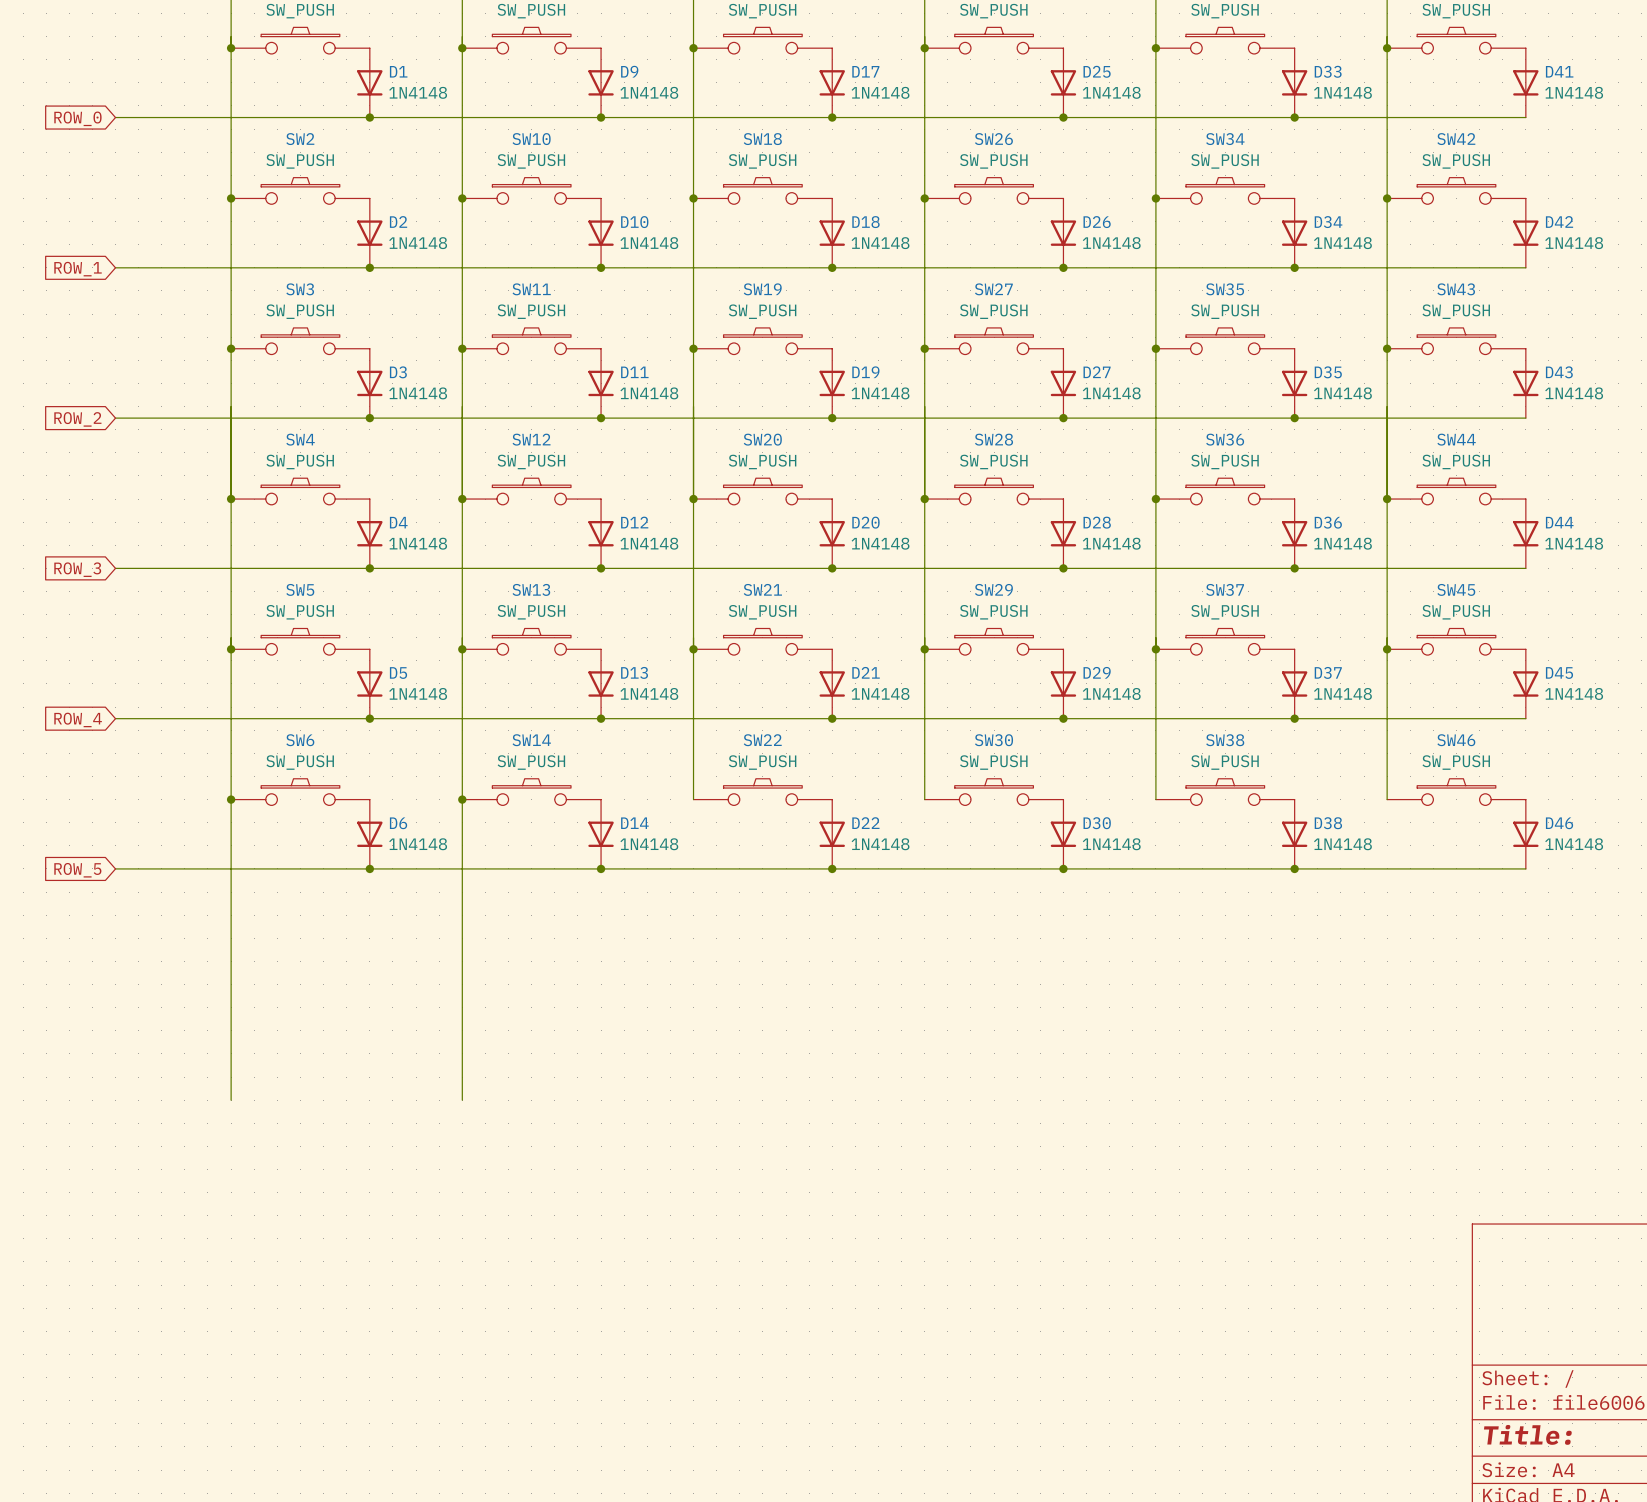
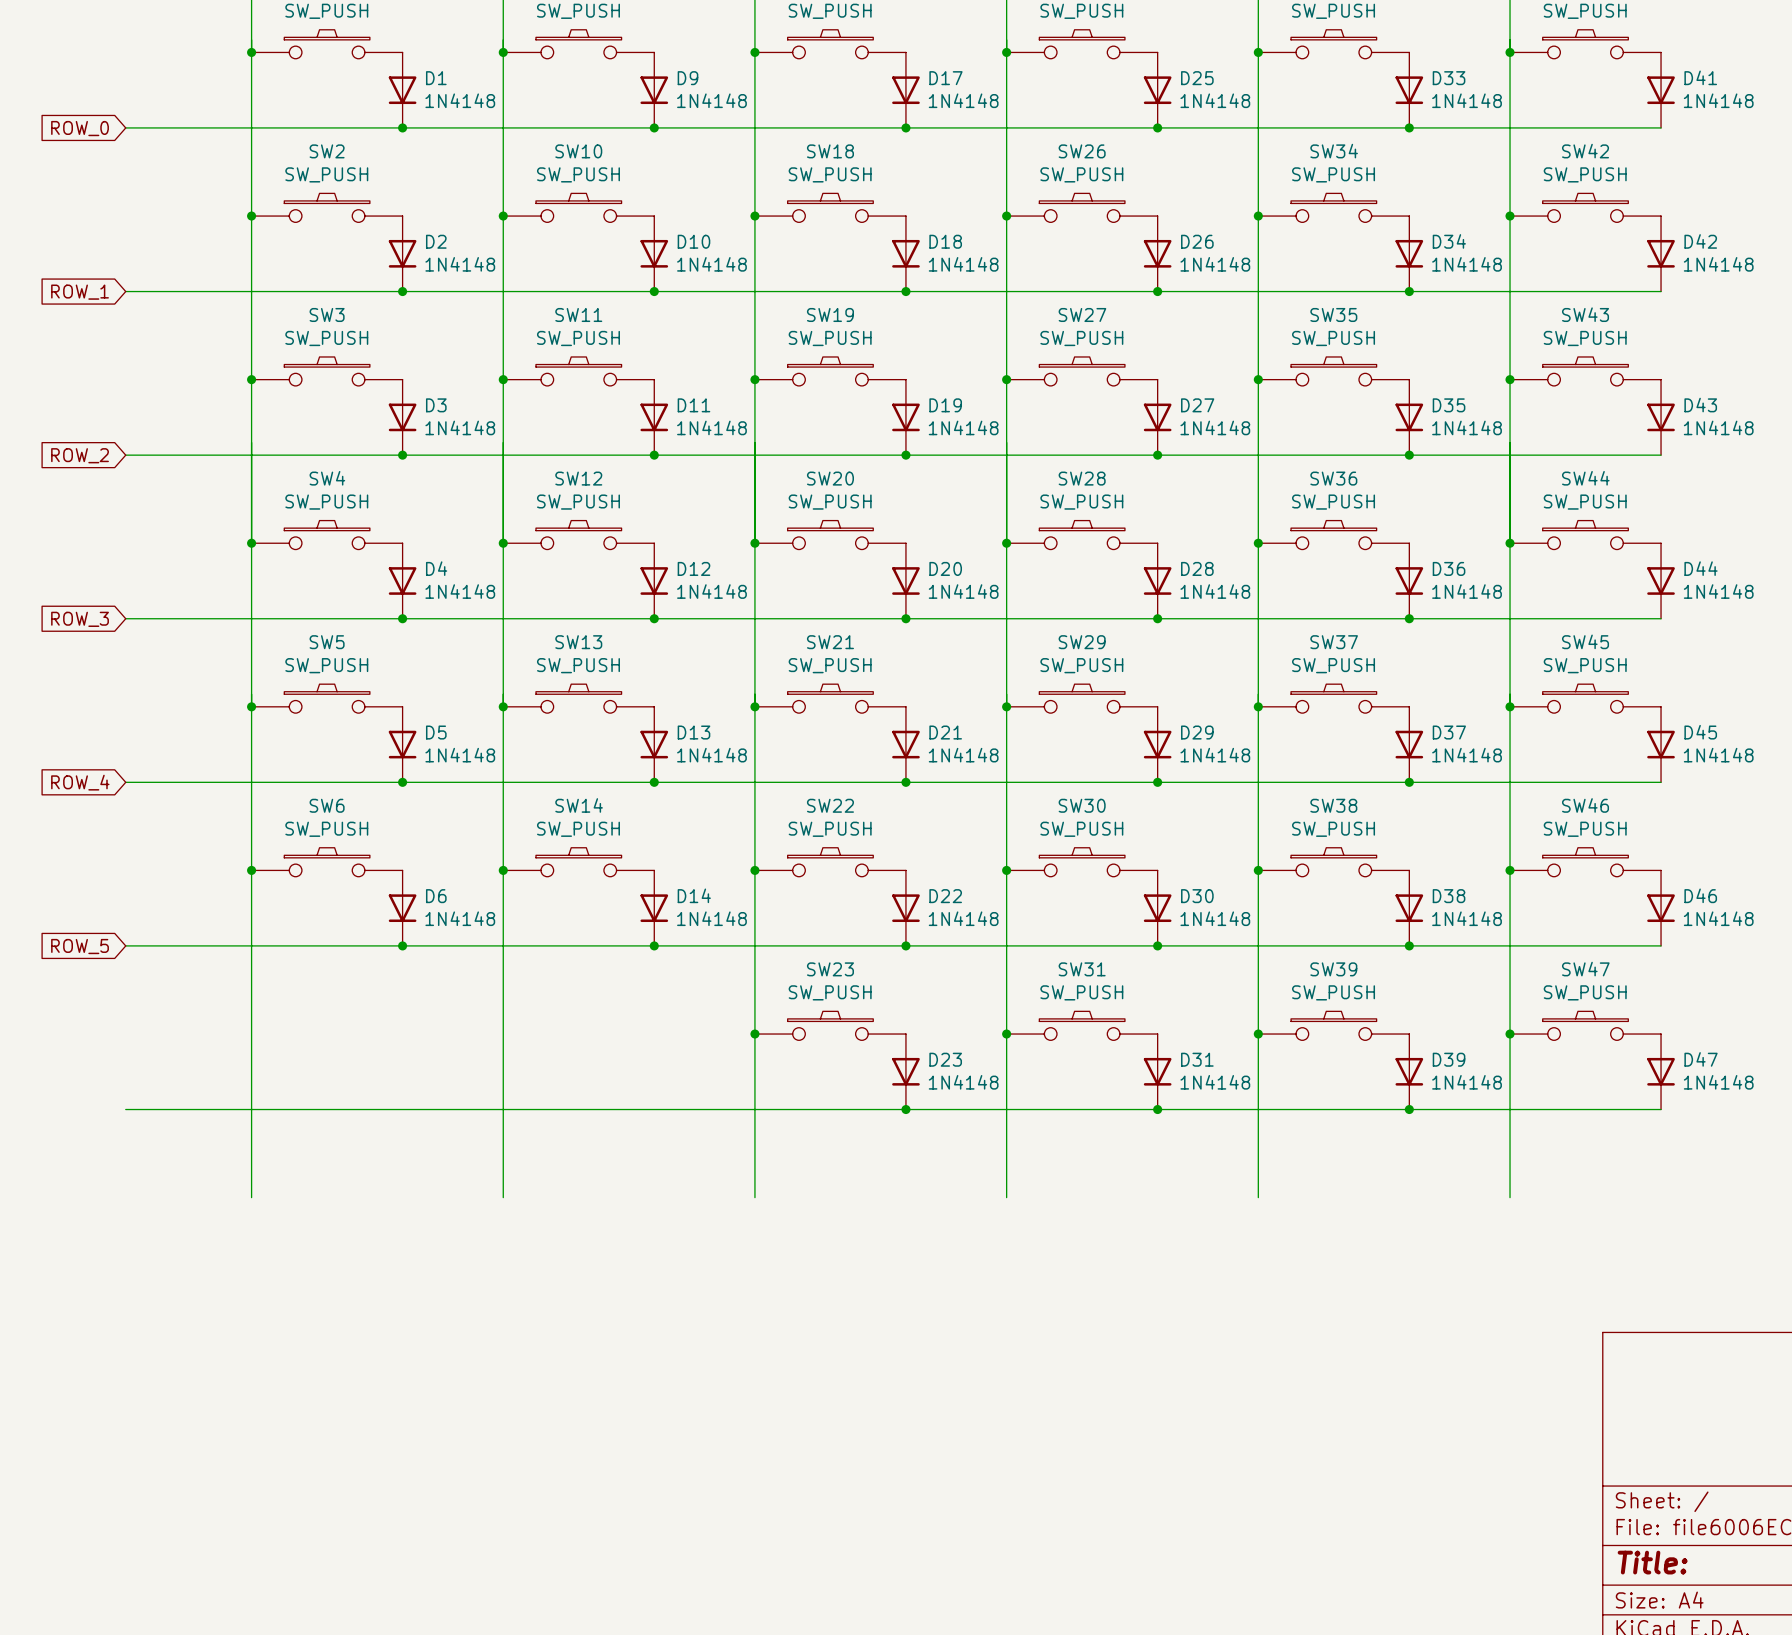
wire: none -> (754, 870) (754, 1197)
junction: none -> (754, 870)
wire: none -> (1006, 870) (1006, 1197)
junction: none -> (1006, 870)
wire: none -> (1258, 870) (1258, 1197)
junction: none -> (1258, 870)
wire: none -> (1510, 870) (1510, 1197)
junction: none -> (1510, 870)
SW23: none -> SW_PUSH (830, 1025)
SW31: none -> SW_PUSH (1082, 1025)
SW39: none -> SW_PUSH (1333, 1025)
SW47: none -> SW_PUSH (1585, 1025)
junction: none -> (754, 1034)
junction: none -> (1006, 1034)
junction: none -> (1258, 1034)
junction: none -> (1510, 1034)
D23: none -> 1N4148 (905, 1071)
D31: none -> 1N4148 (1157, 1071)
D39: none -> 1N4148 (1409, 1071)
D47: none -> 1N4148 (1661, 1071)
wire: none -> (125, 1109) (1661, 1109)
junction: none -> (905, 1109)
junction: none -> (1157, 1109)
junction: none -> (1409, 1109)

